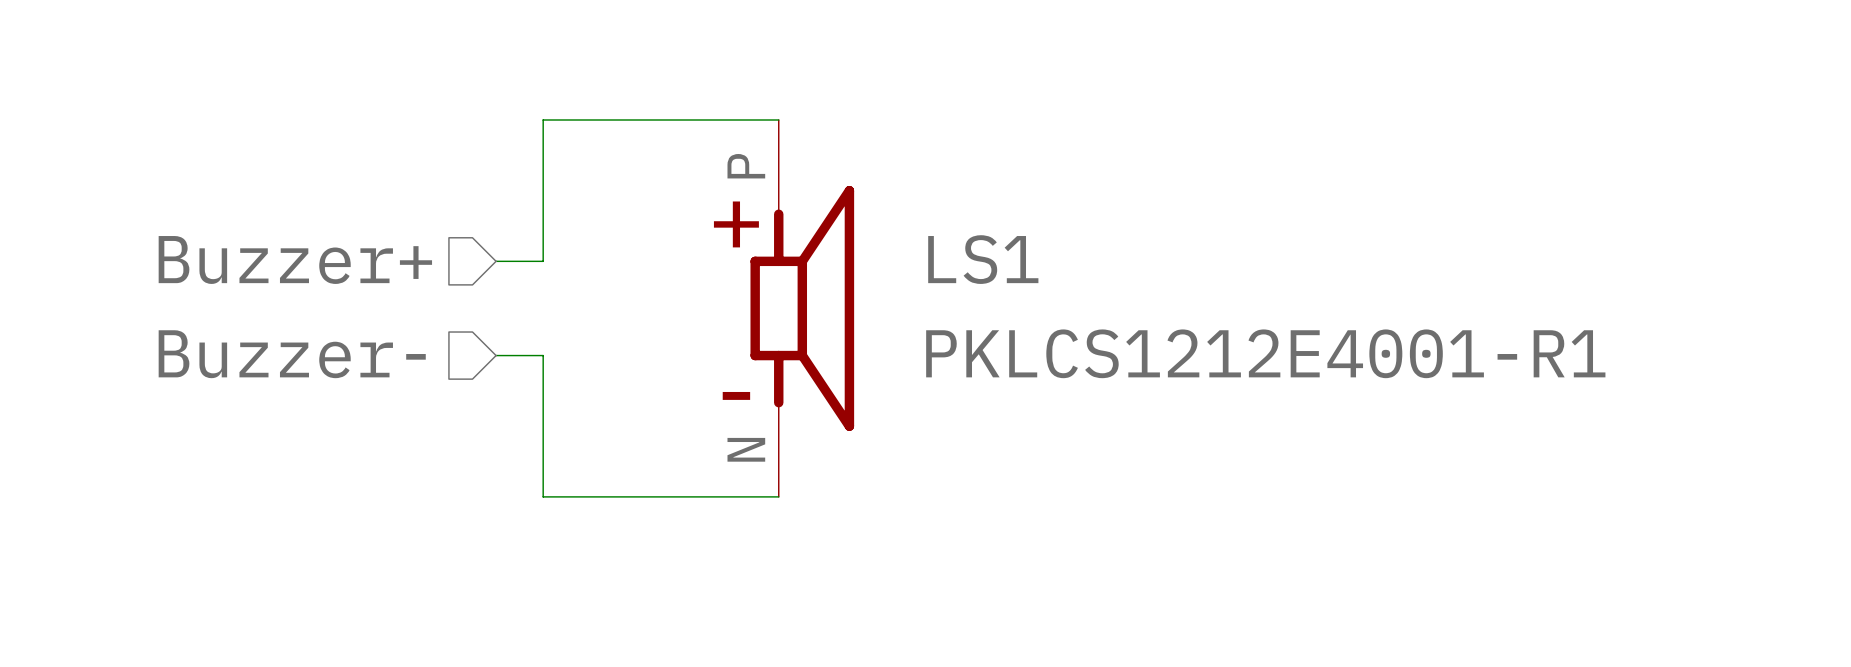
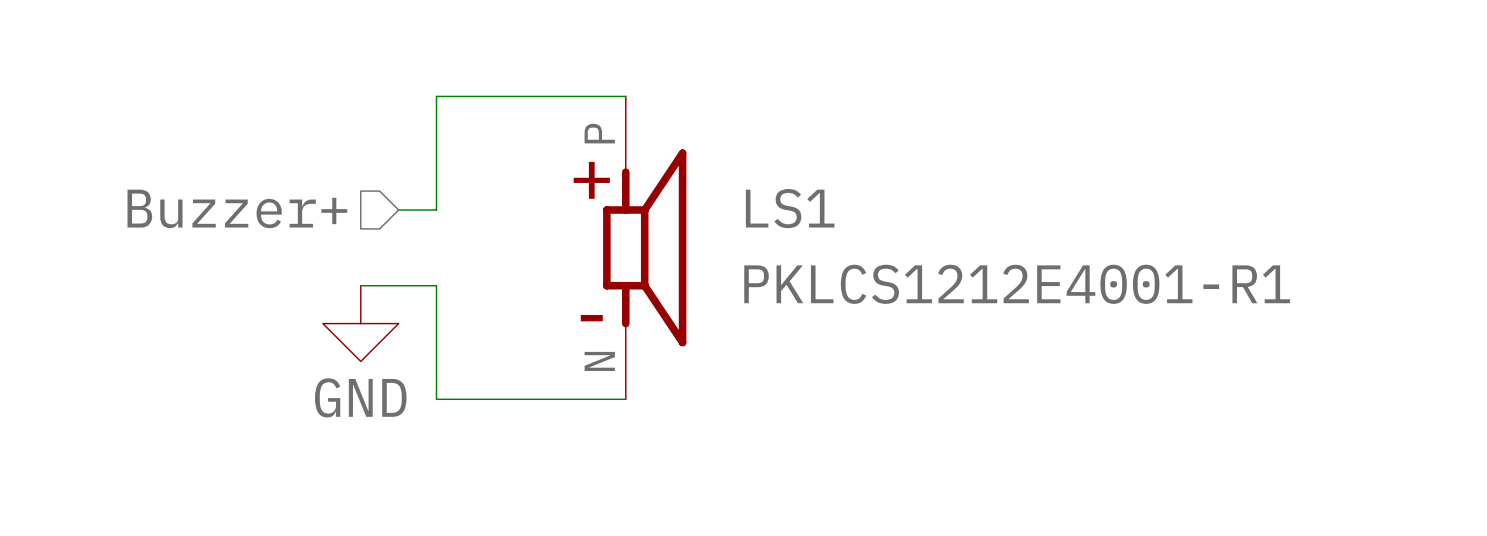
hierarchical label: Buzzer- (292, 354) -> none
wire: none -> (360, 285) (398, 285)
power symbol: none -> GND (360, 323)

